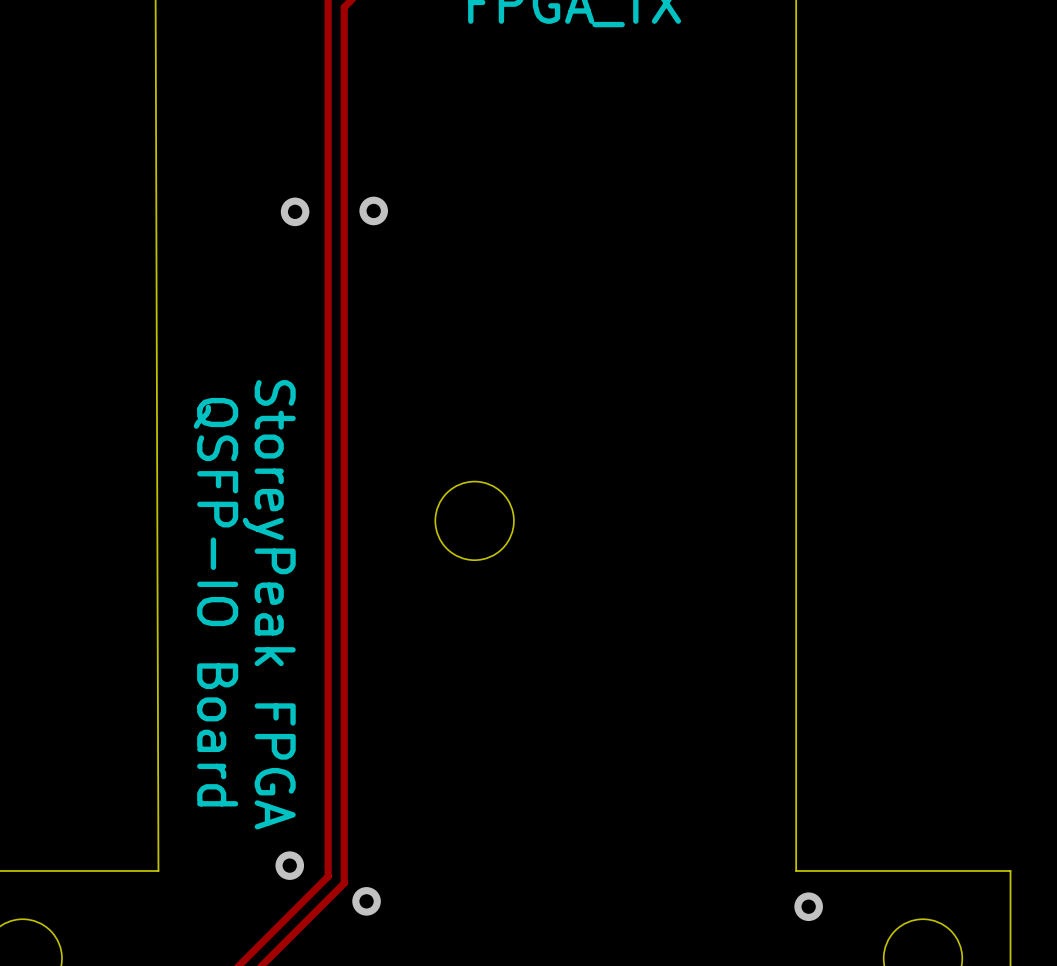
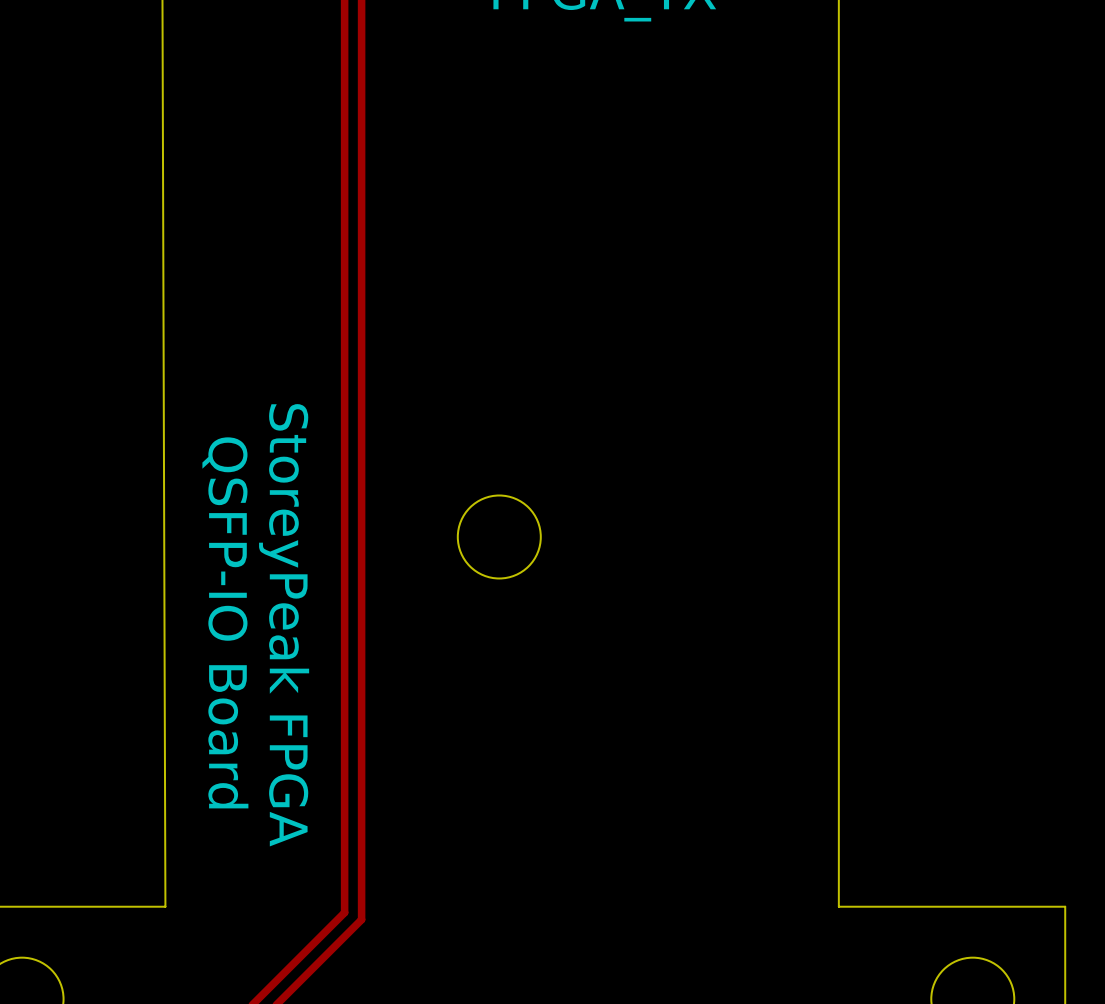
via: (373, 210) -> none
via: (295, 211) -> none
via: (289, 865) -> none
via: (366, 901) -> none
via: (808, 906) -> none

